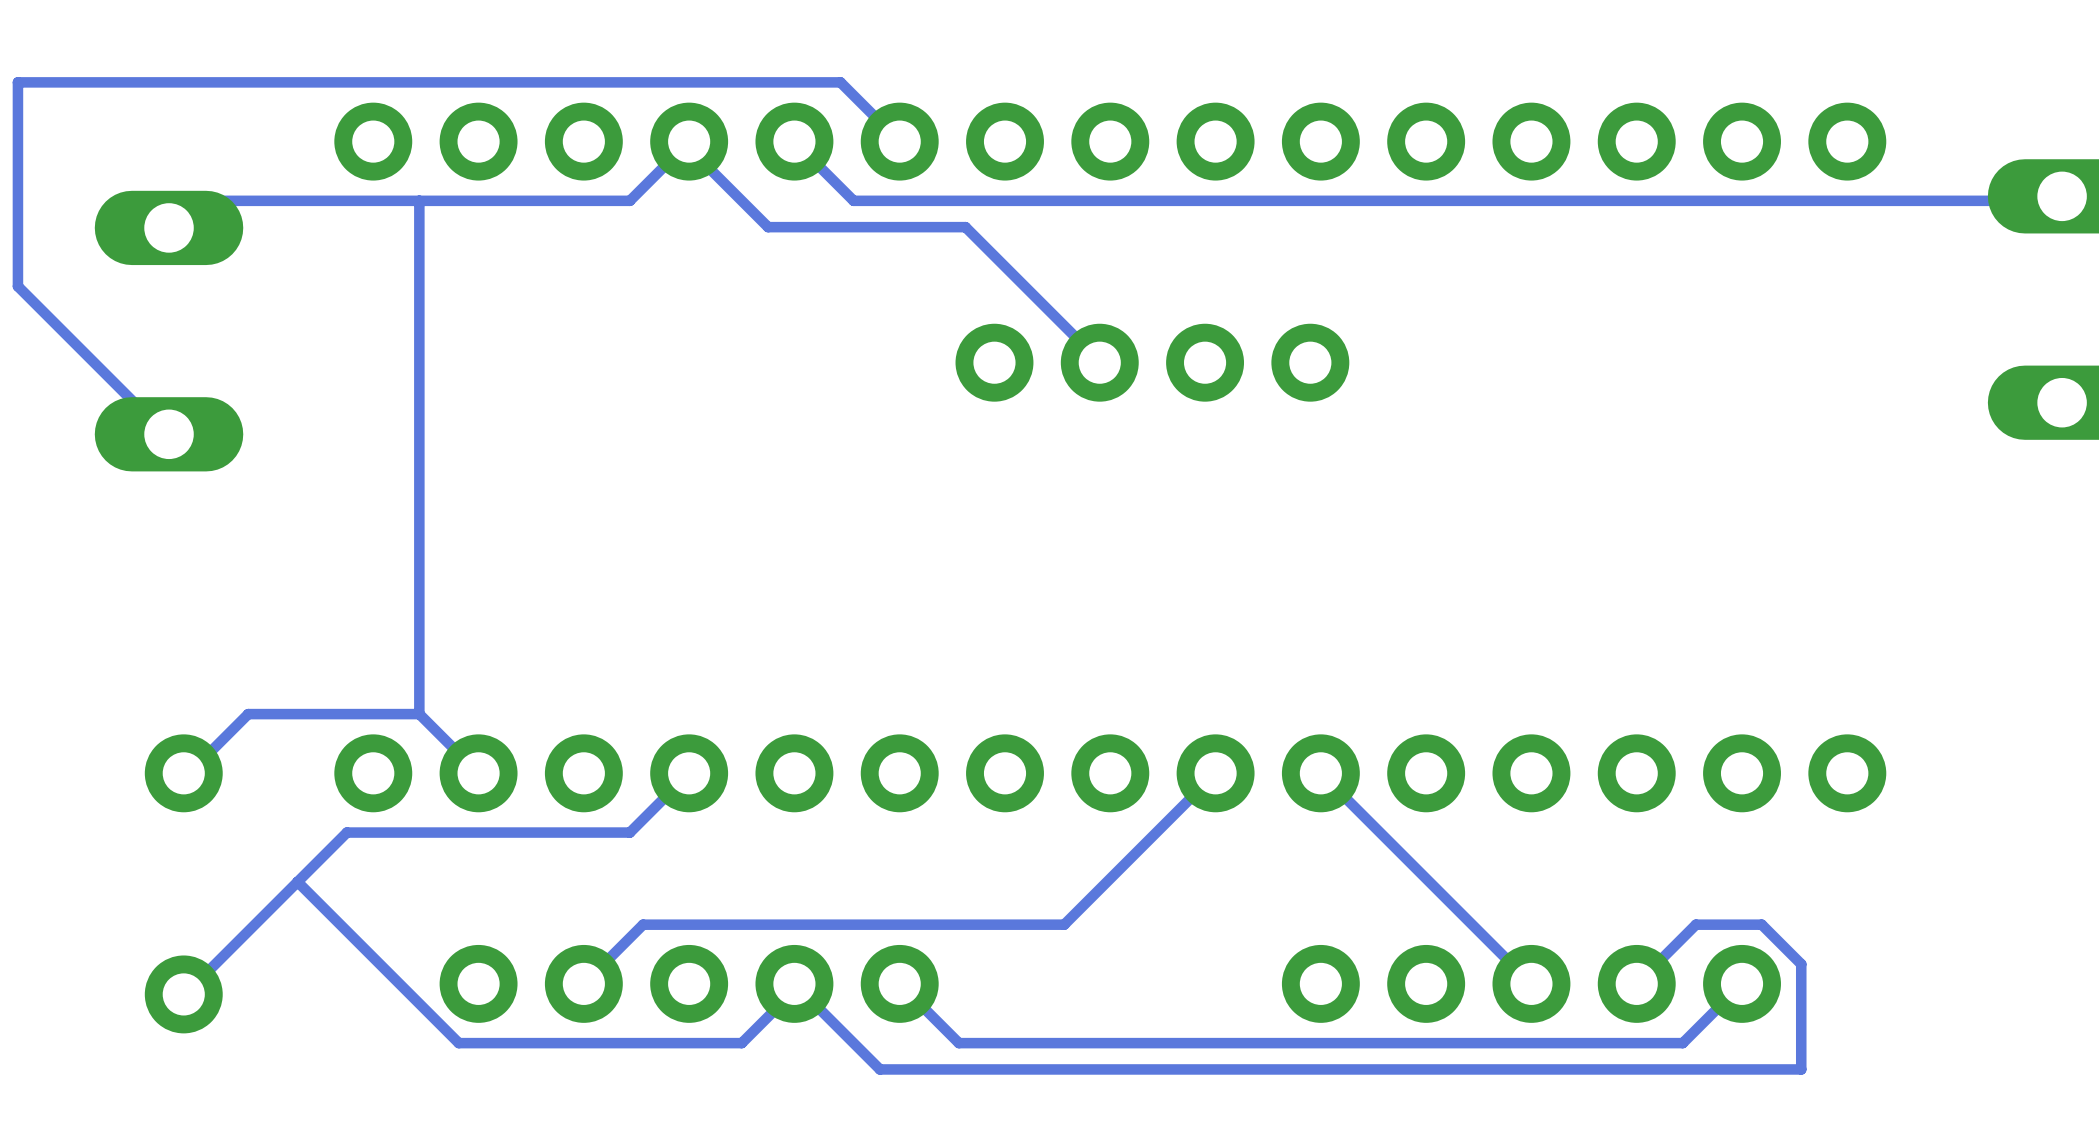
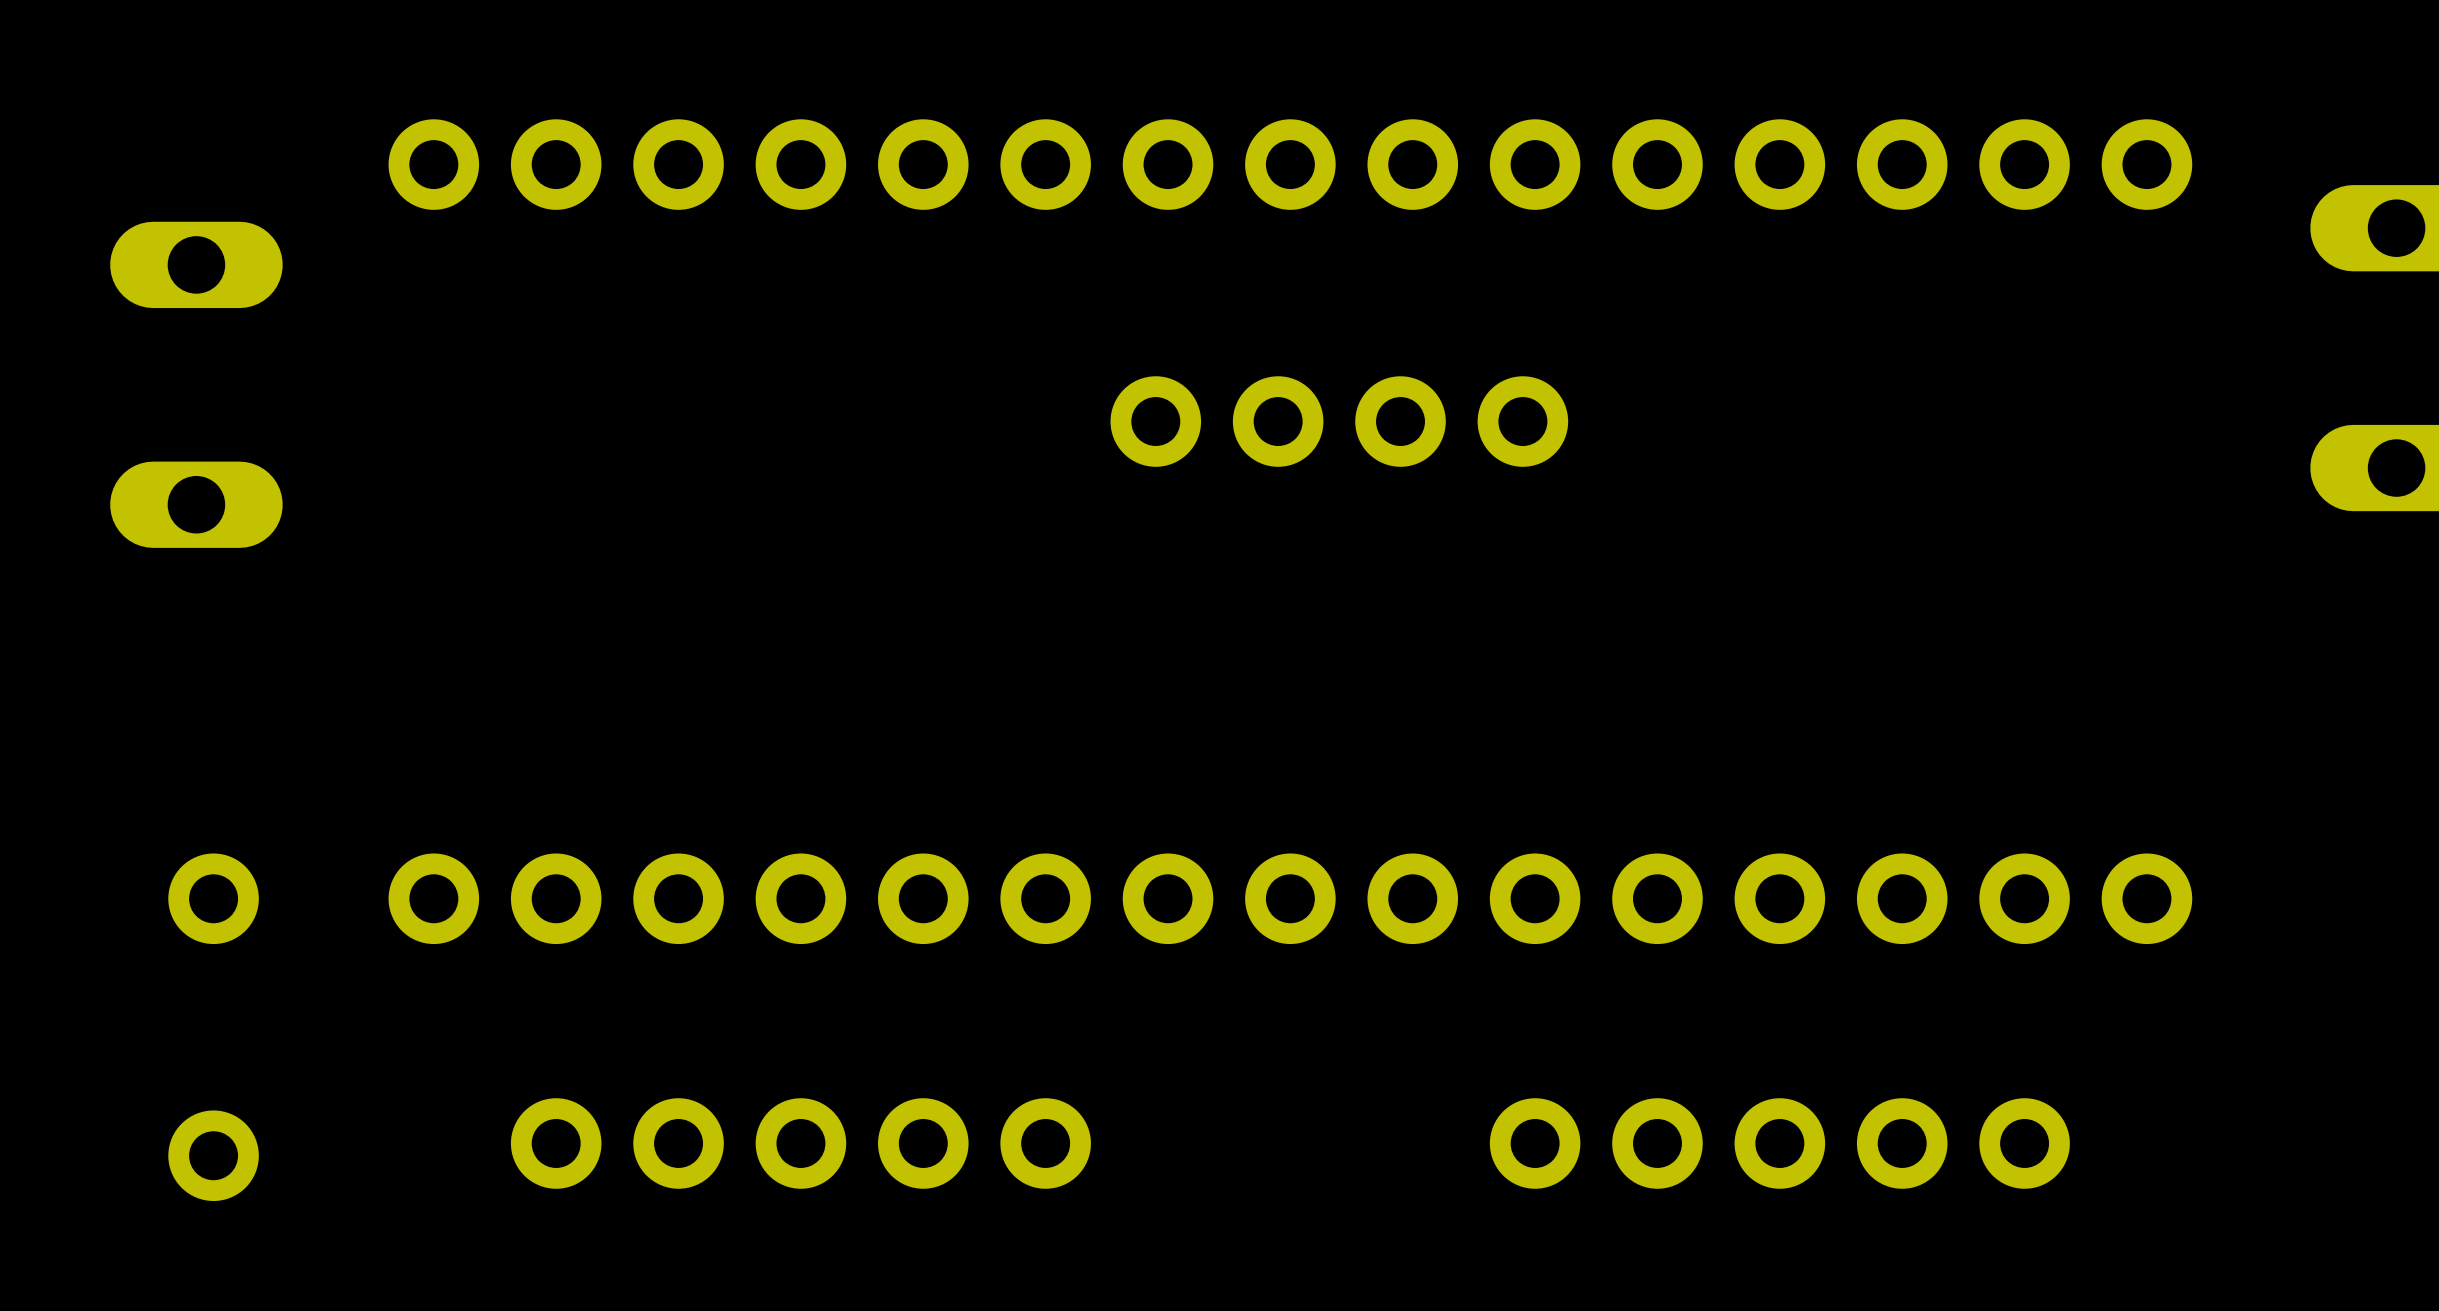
track: (794, 141) (853, 200) (2057, 200) (2062, 196) -> none
track: (899, 141) (840, 82) (17, 82) (17, 286) (162, 431) (169, 434) -> none
track: (419, 200) (419, 714) -> none
track: (169, 227) (195, 200) (629, 200) (689, 141) (689, 148) (768, 227) (965, 227) (1099, 362) -> none
track: (419, 714) (478, 773) -> none
track: (419, 714) (248, 714) (189, 773) (183, 773) -> none
track: (689, 773) (629, 832) (346, 832) (183, 994) -> none
track: (1215, 773) (1064, 924) (643, 924) (583, 983) -> none
track: (1320, 773) (1531, 983) -> none
track: (297, 881) (458, 1043) (741, 1043) (794, 990) (794, 983) (879, 1069) (1801, 1069) (1801, 964) (1761, 924) (1695, 924) (1636, 983) -> none
track: (1742, 983) (1682, 1043) (958, 1043) (899, 983) -> none

